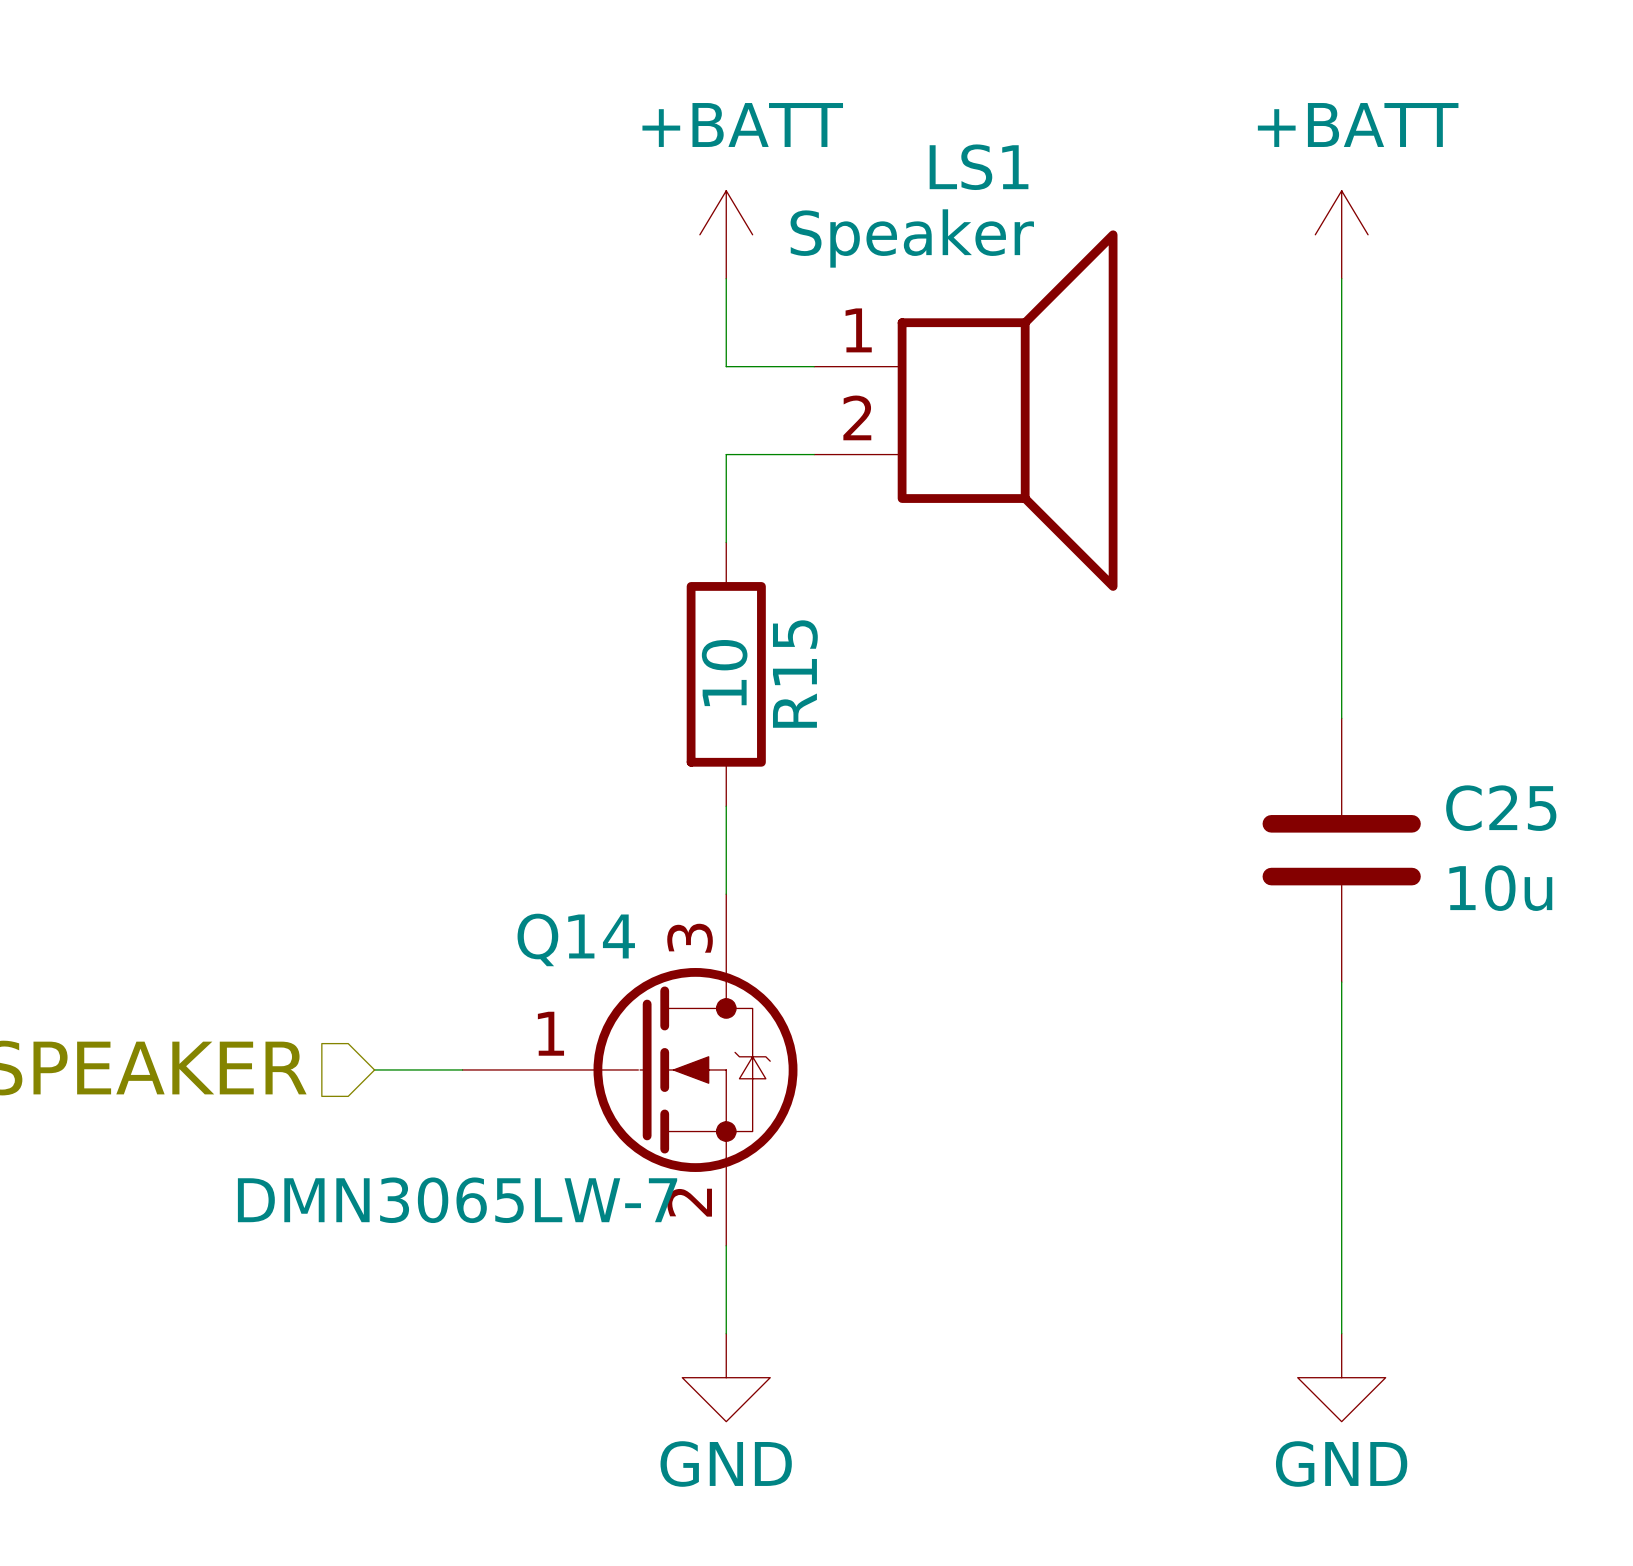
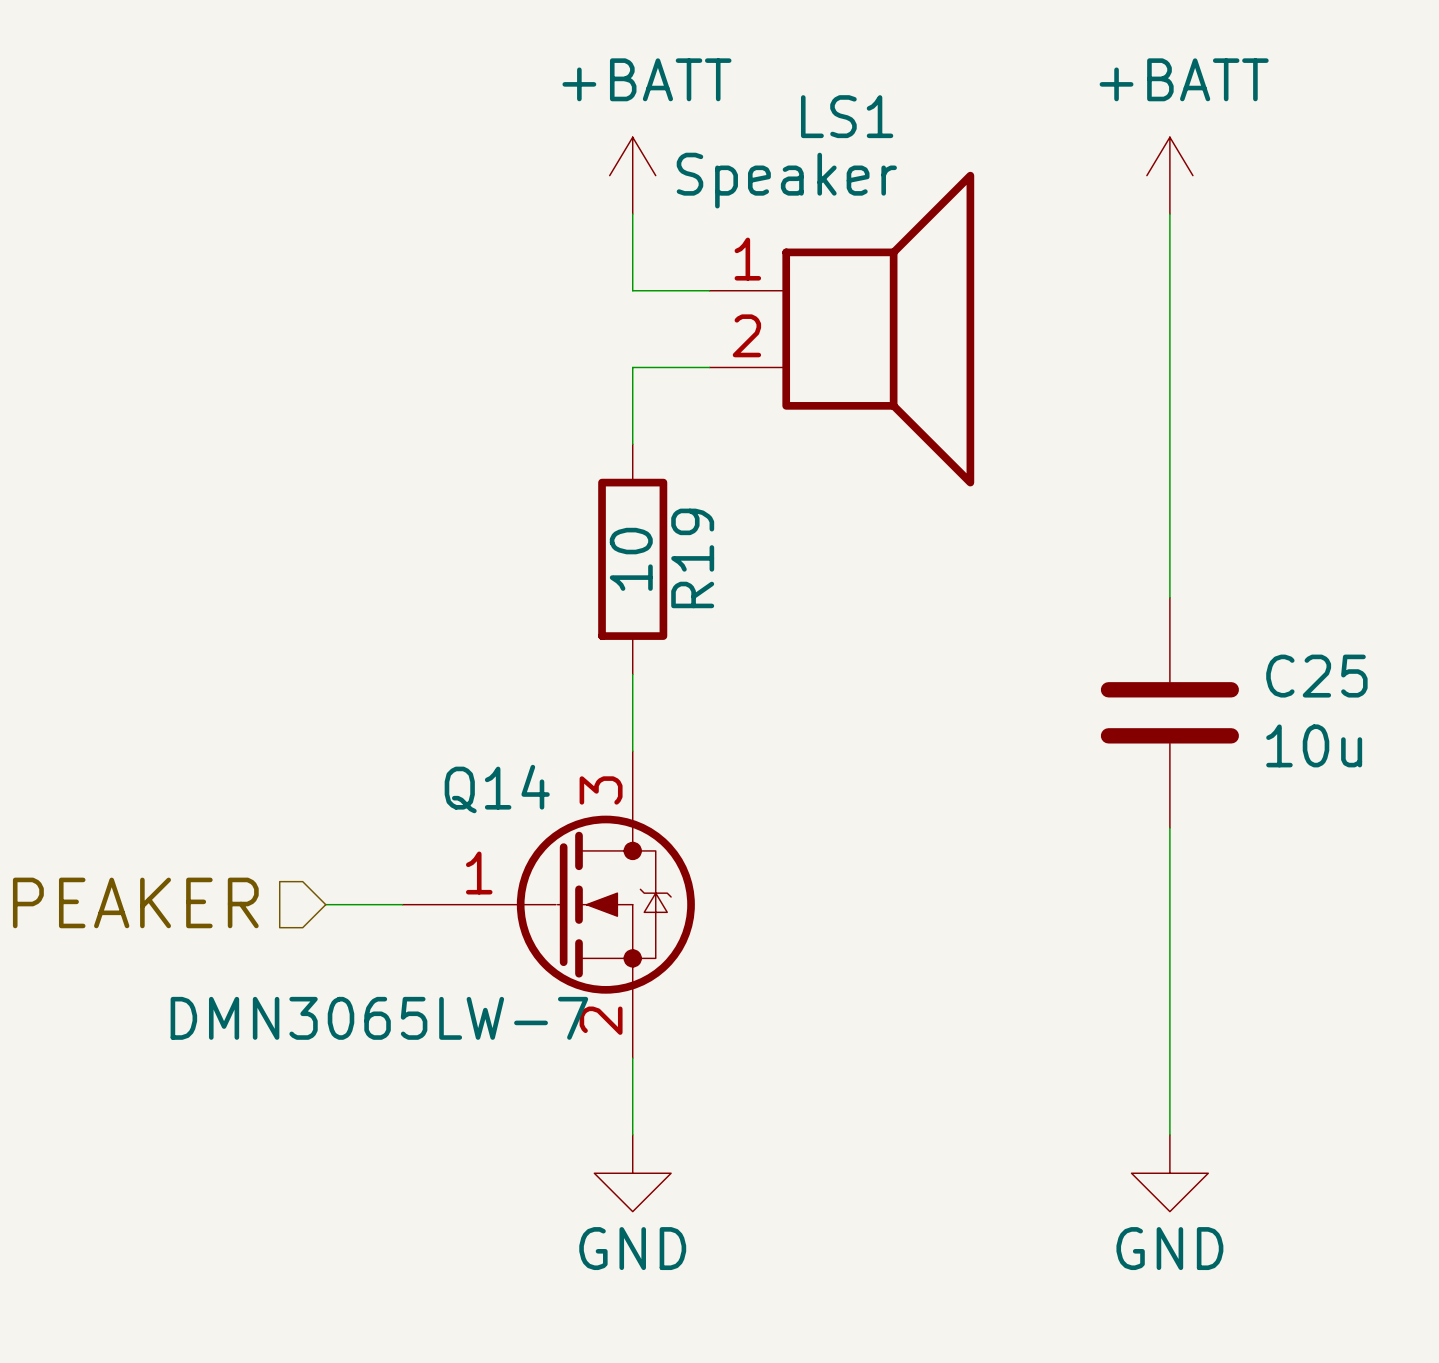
R15 name: R15 (795, 674) -> R19 (692, 558)

